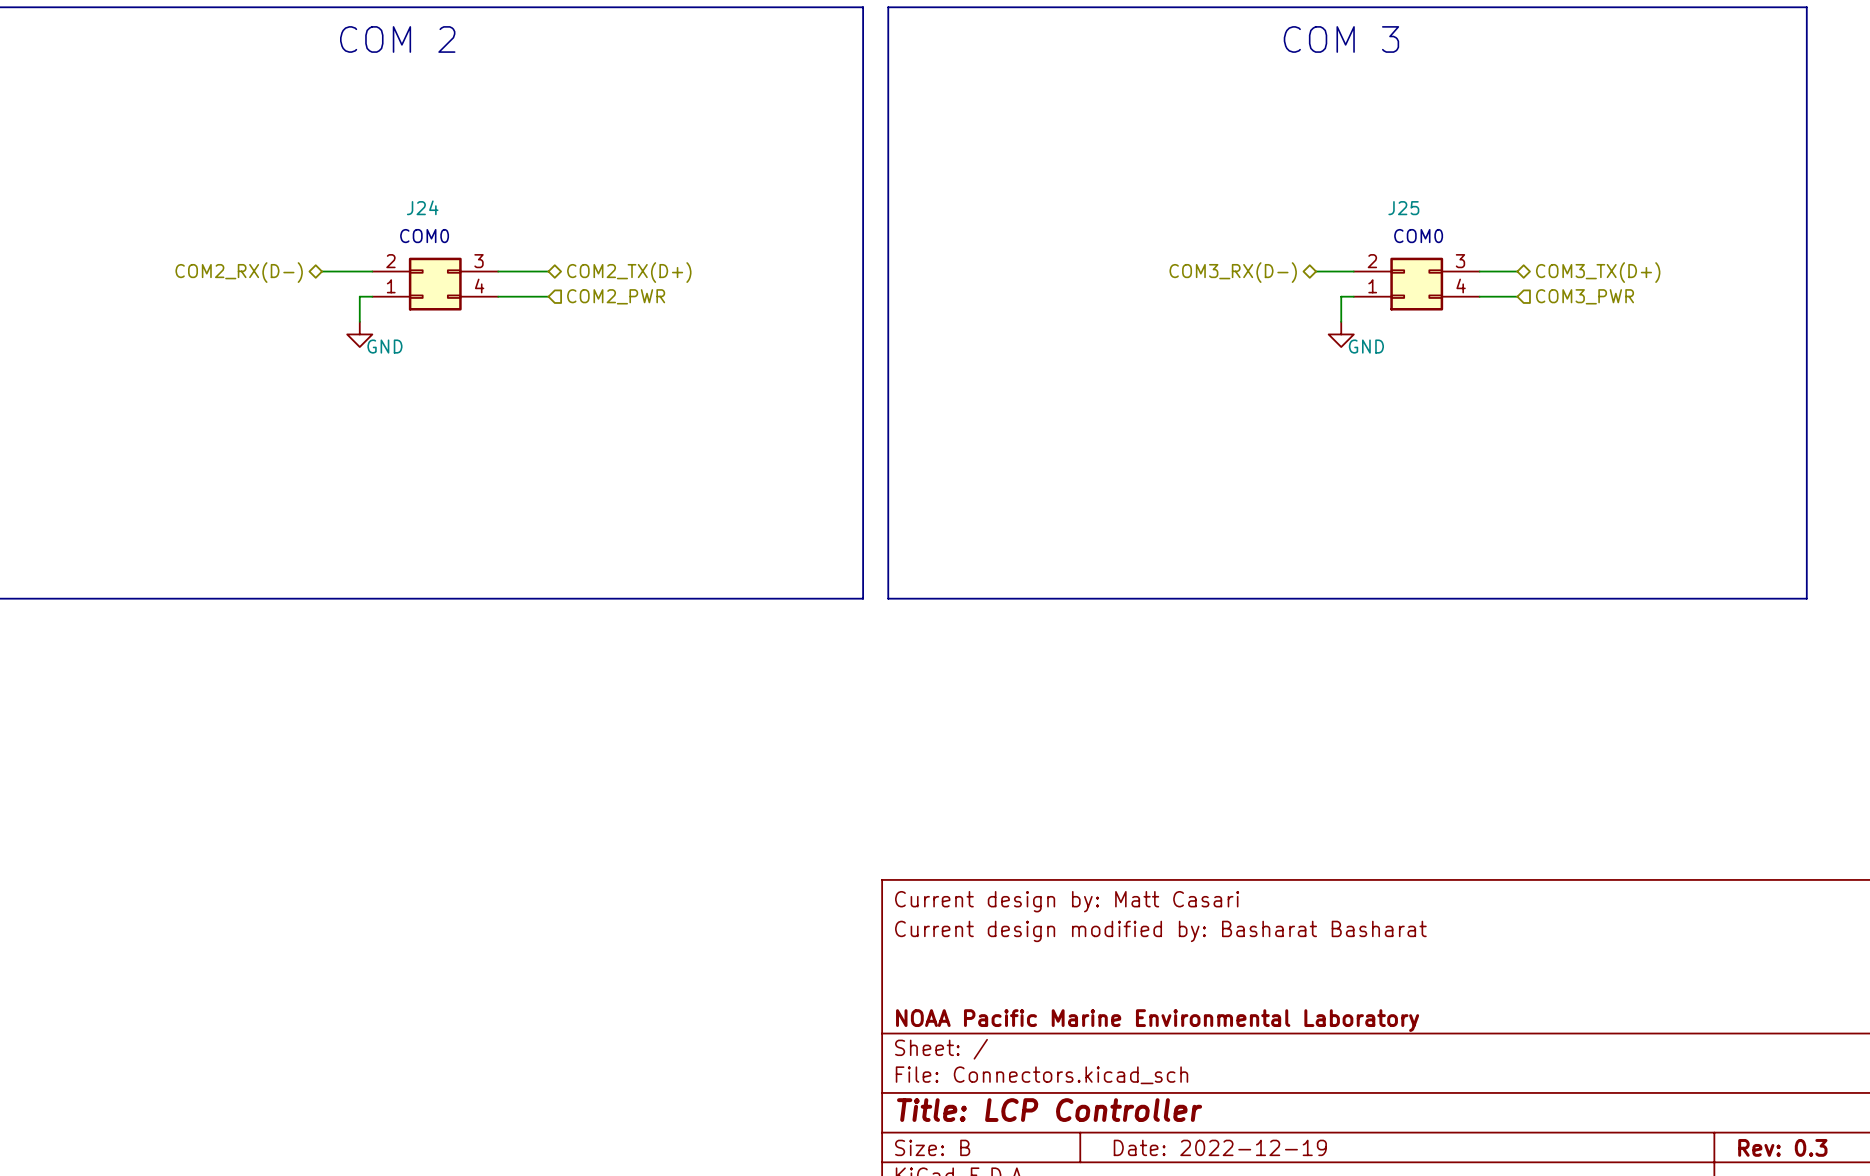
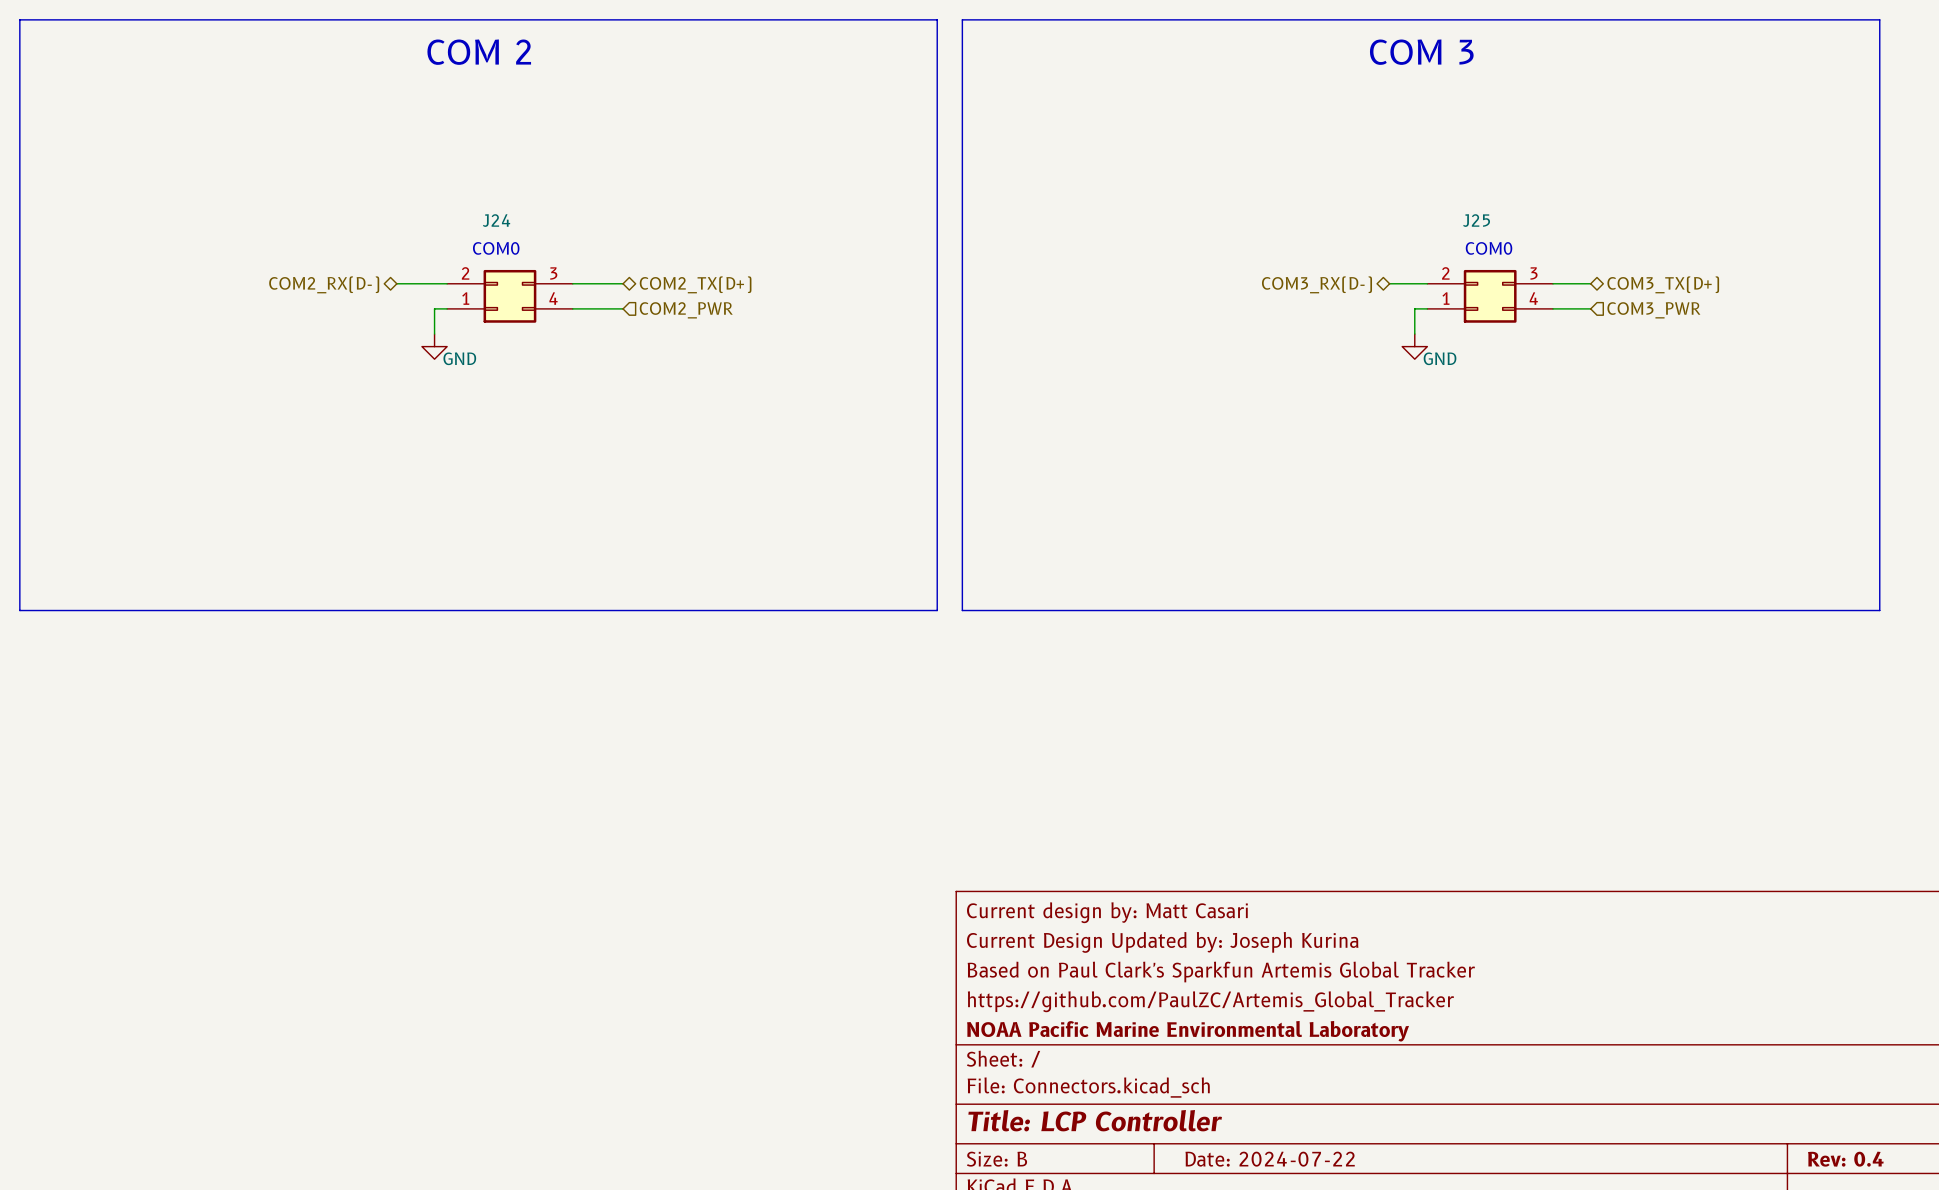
title block: Current design modified by: Basharat Basharat (1160, 931) -> Current Design Updated by: Joseph Kurina (1162, 942)
title block: none -> Based on Paul Clark's Sparkfun Artemis Global Tracker (1221, 972)
title block: none -> https://github.com/PaulZC/Artemis_Global_Tracker (1210, 1001)
title block: Date: 2022-12-19 (1220, 1147) -> Date: 2024-07-22 (1270, 1159)
title block: Rev: 0.3 (1782, 1147) -> Rev: 0.4 (1845, 1159)

